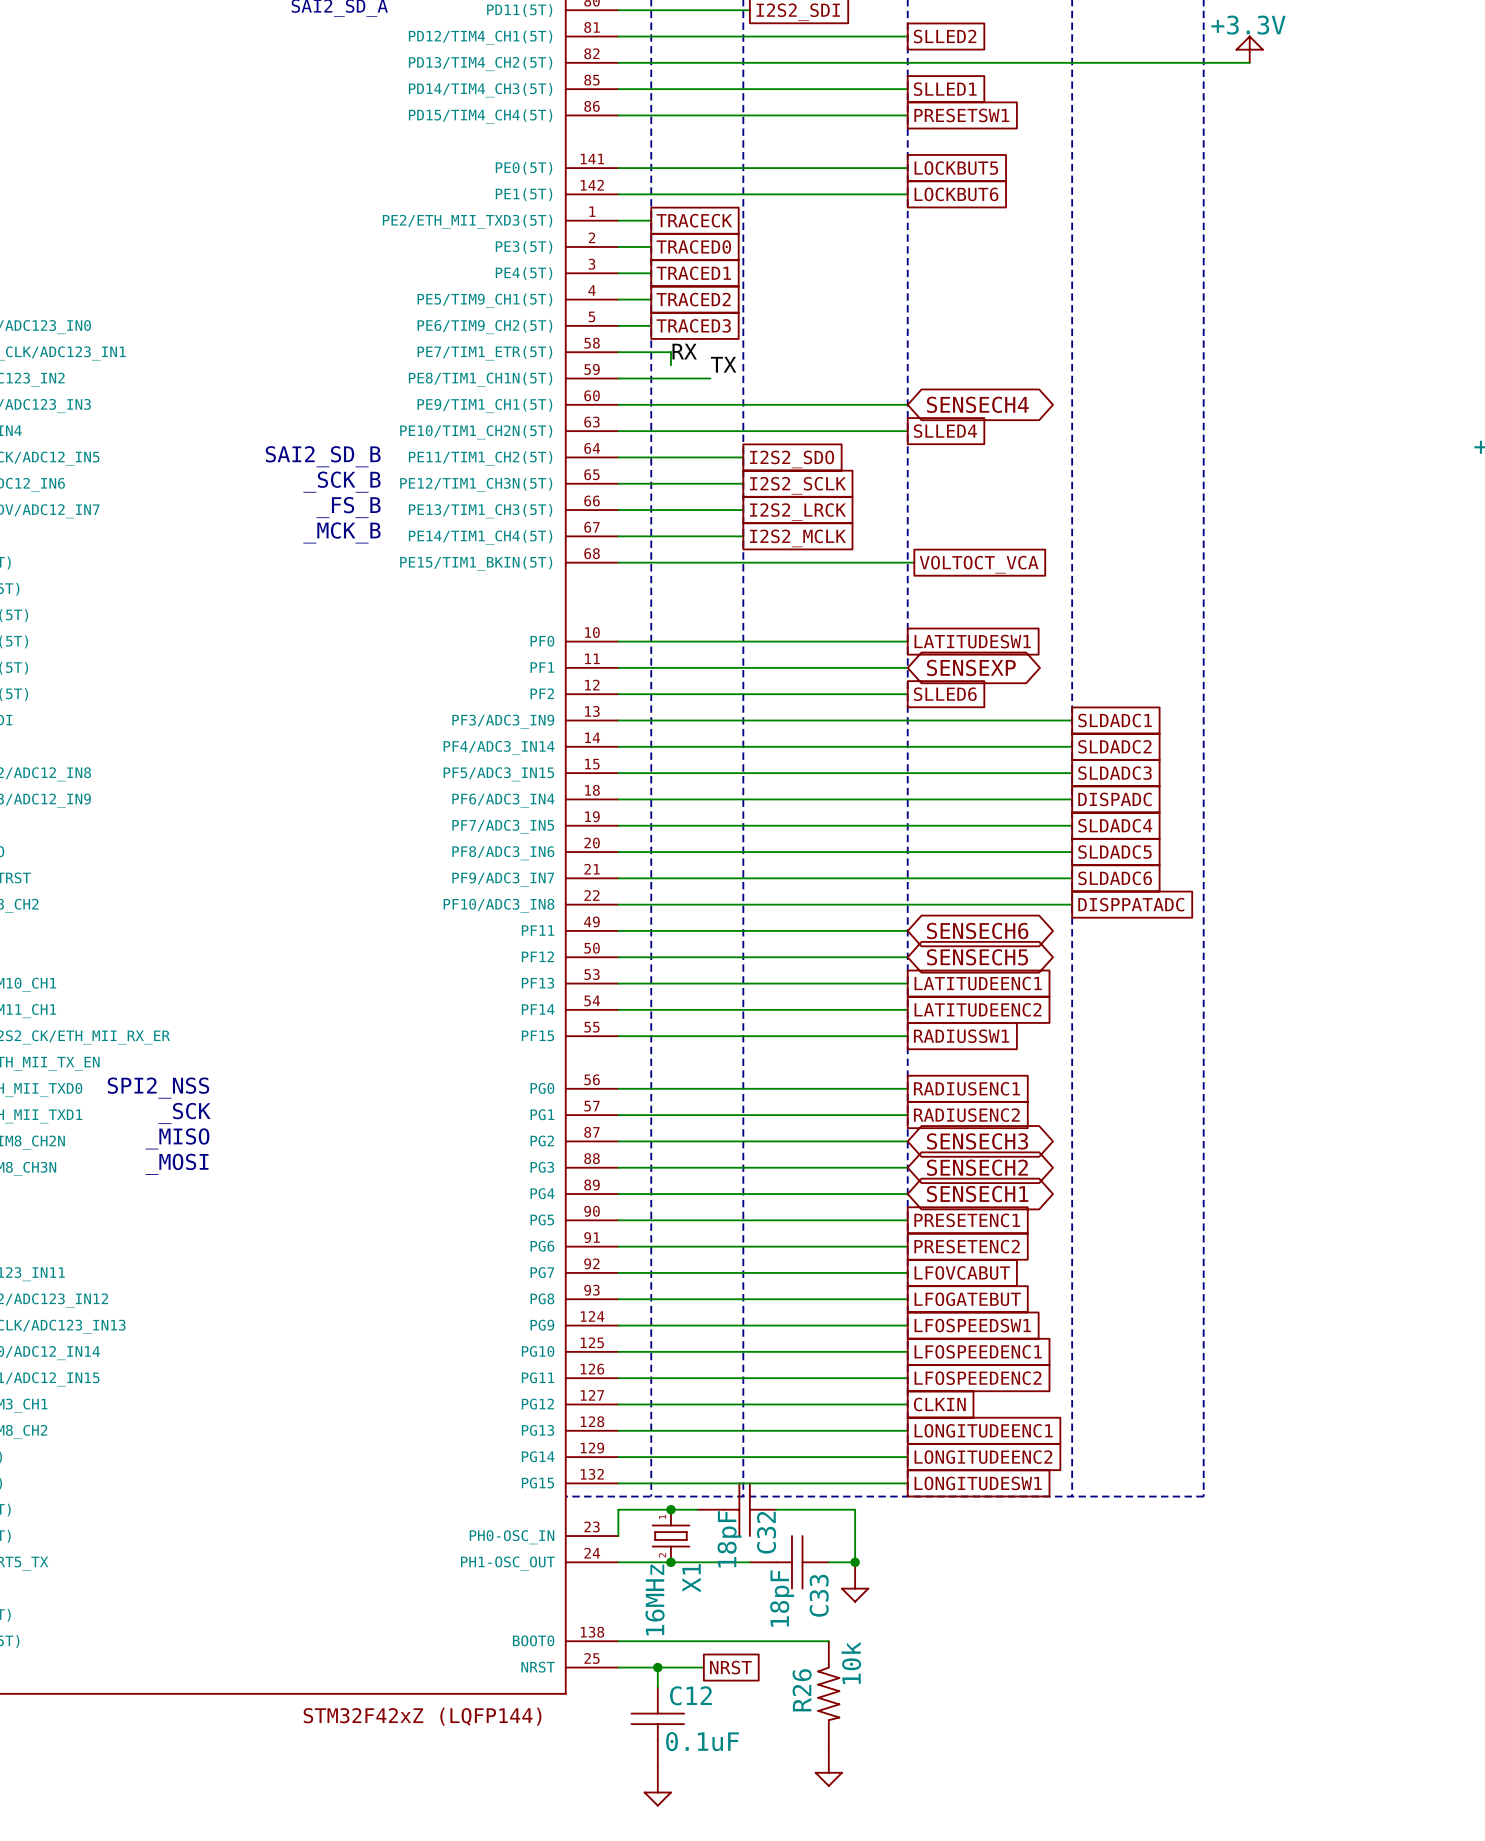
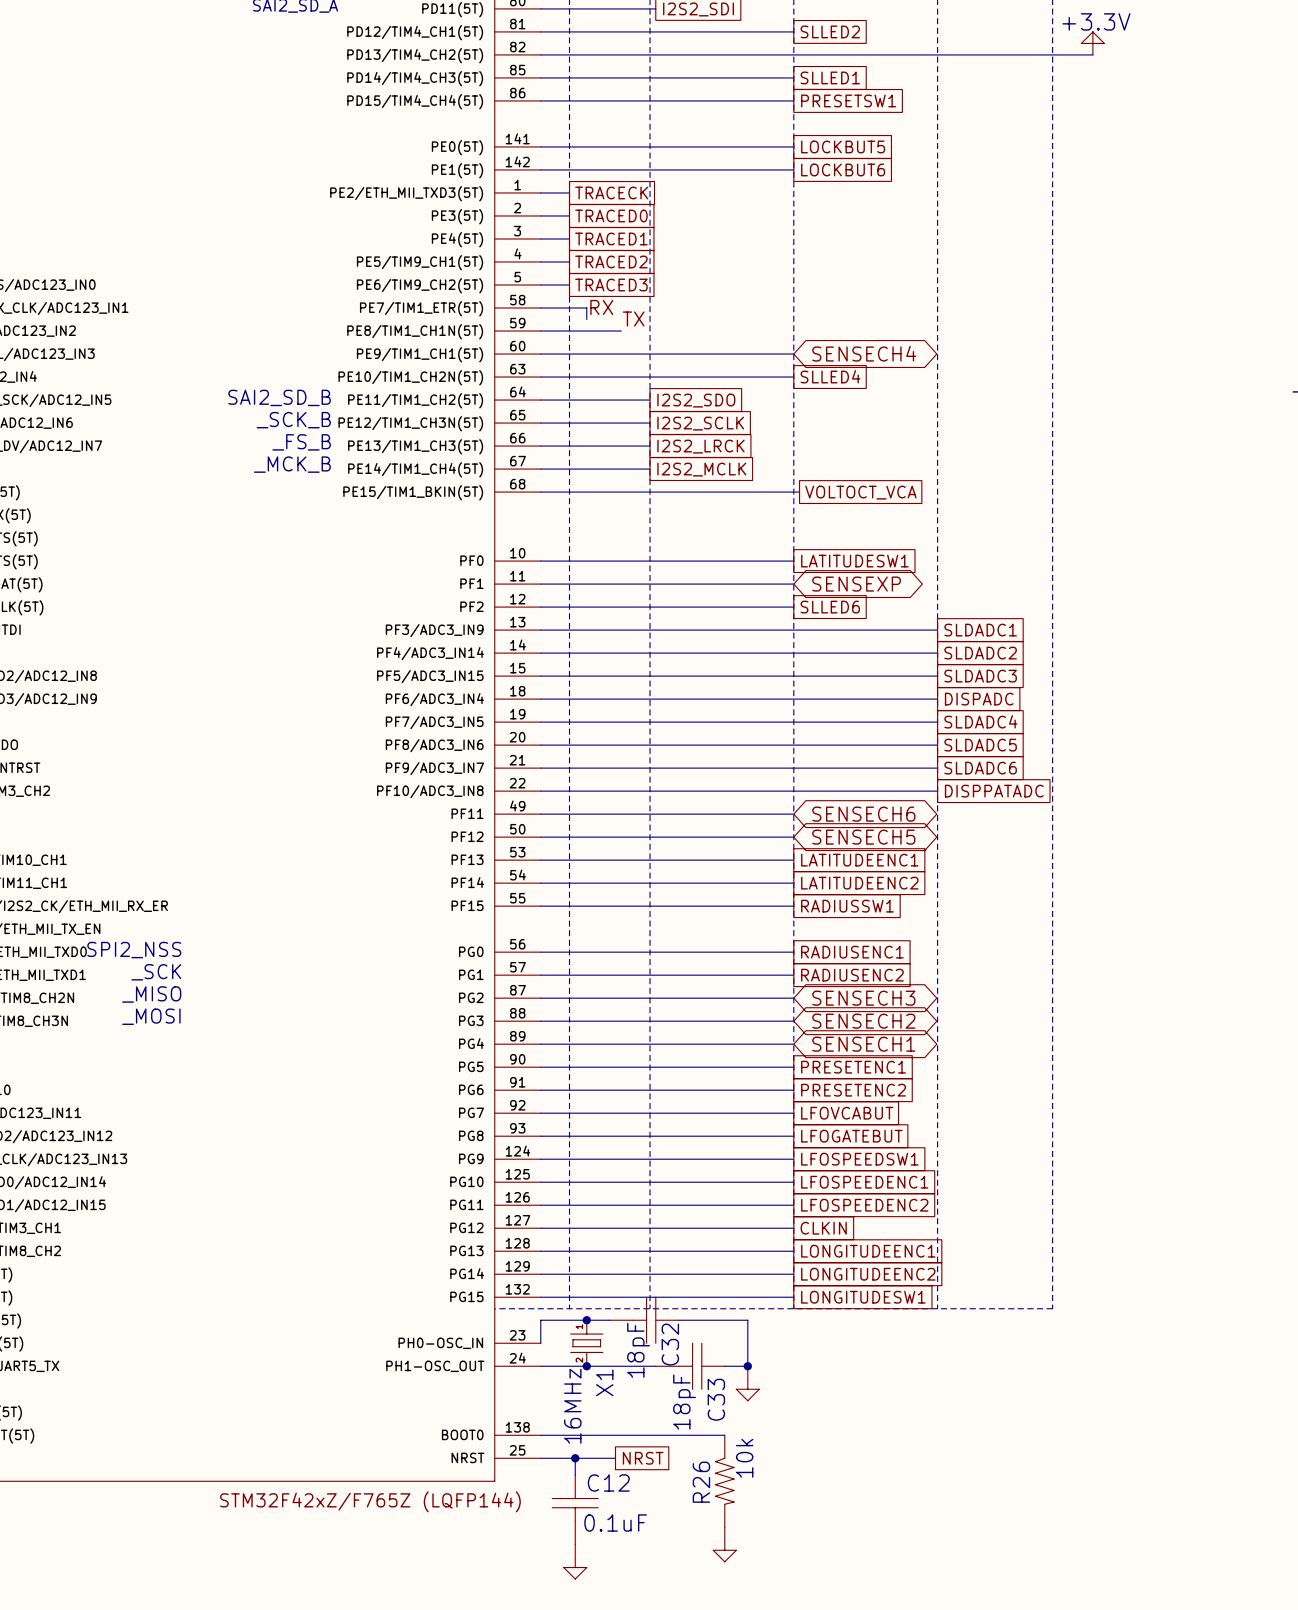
part text: STM32F42xZ (LQFP144) (422, 1716) -> STM32F42xZ/F765Z (LQFP144) (370, 1501)

